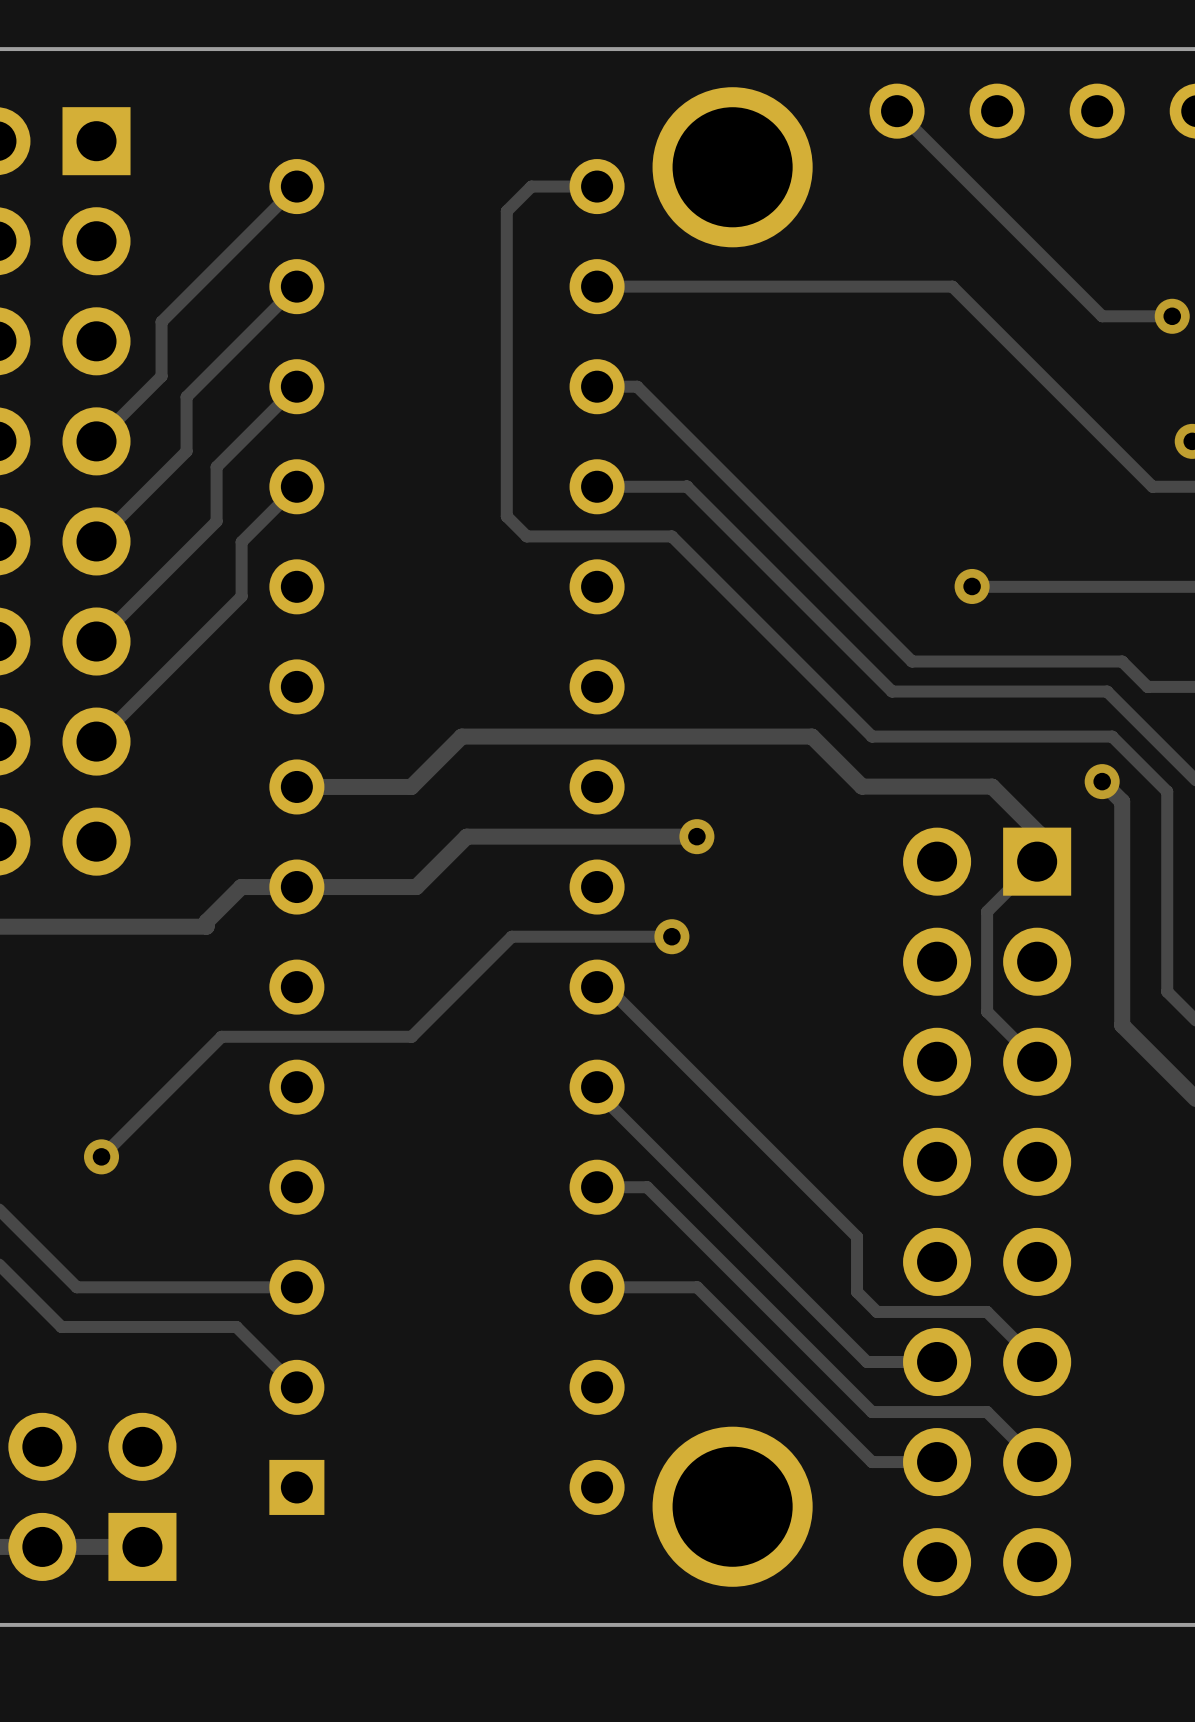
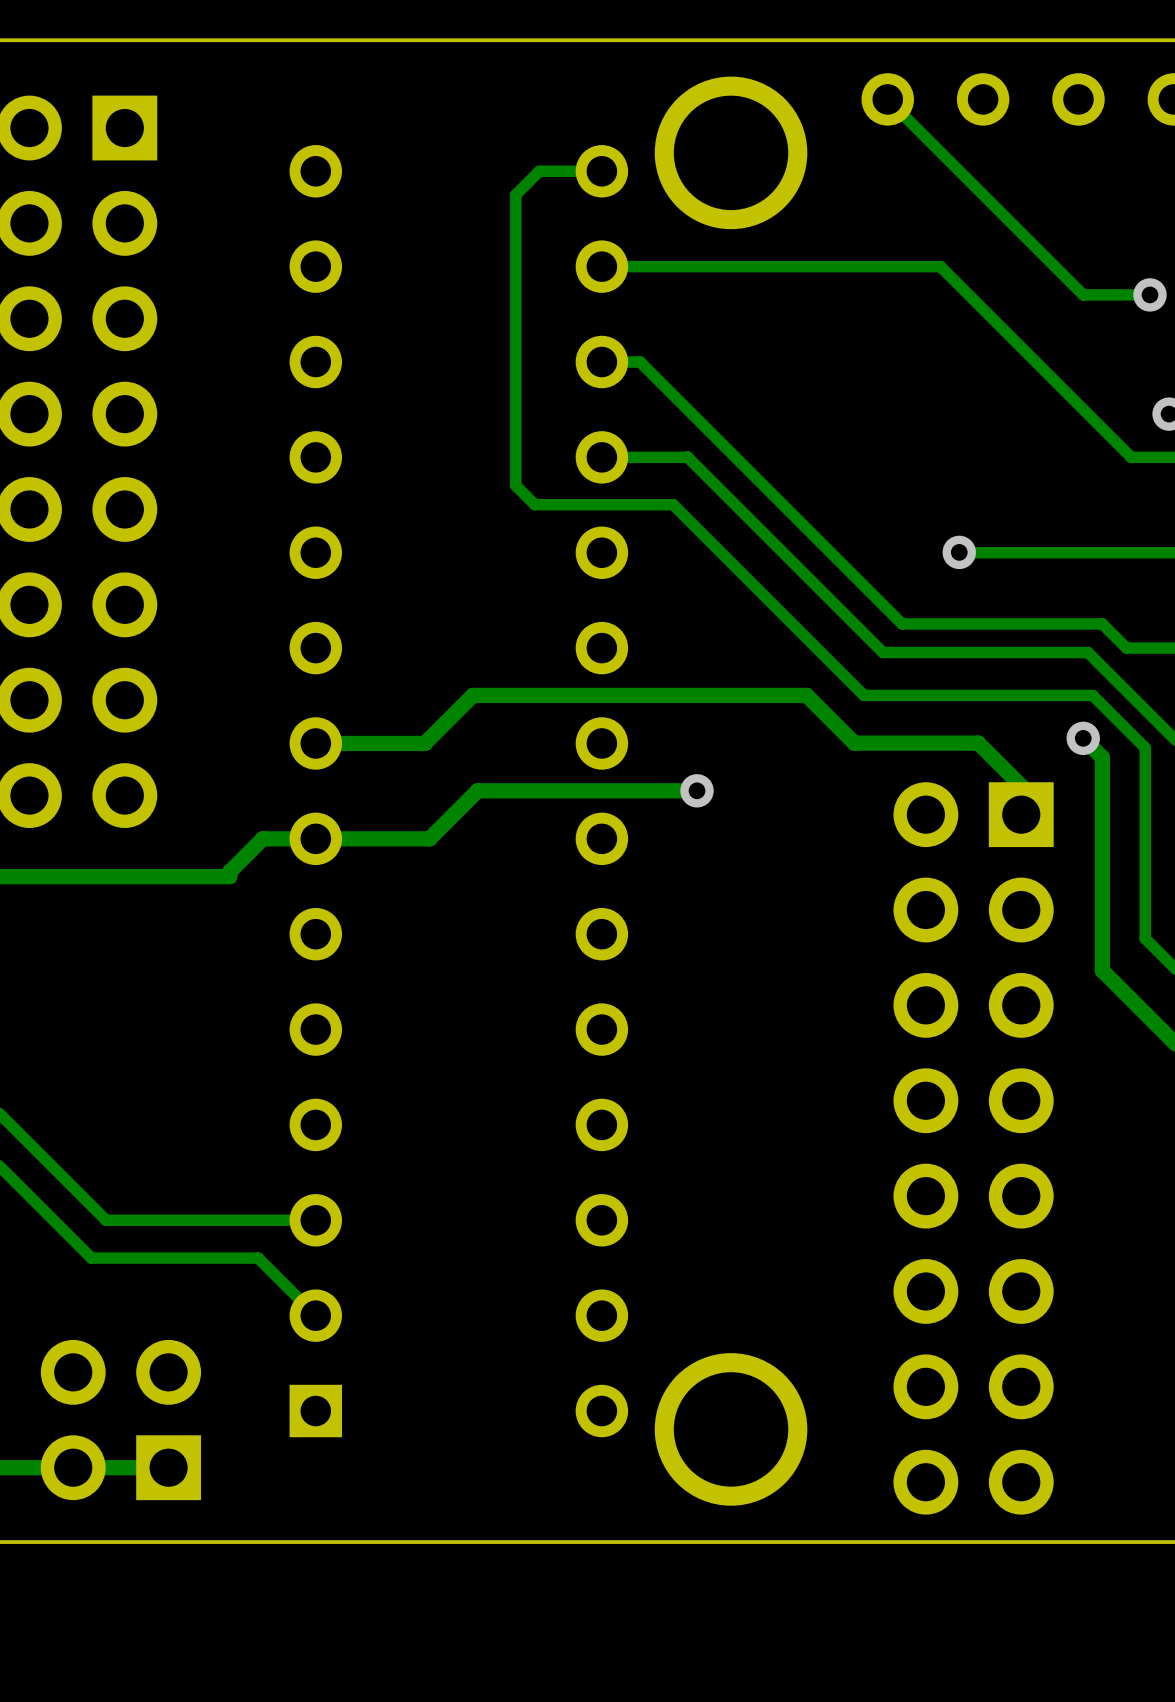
track: (296, 186) (161, 321) (161, 376) (96, 441) -> none
track: (296, 286) (186, 396) (186, 451) (96, 541) -> none
track: (296, 386) (216, 466) (216, 521) (96, 641) -> none
track: (296, 486) (241, 542) (241, 596) (96, 741) -> none
track: (1037, 861) (987, 911) (987, 1011) (1037, 1061) -> none
track: (671, 936) (511, 936) (411, 1036) (221, 1036) (101, 1156) -> none
via: (671, 936) -> none
track: (597, 987) (607, 987) (857, 1236) (857, 1291) (877, 1311) (987, 1311) (1037, 1362) -> none
track: (597, 1087) (597, 1092) (867, 1362) (937, 1362) -> none
via: (101, 1156) -> none
track: (597, 1187) (647, 1187) (872, 1412) (987, 1412) (1037, 1462) -> none
track: (597, 1287) (697, 1287) (872, 1462) (937, 1462) -> none

